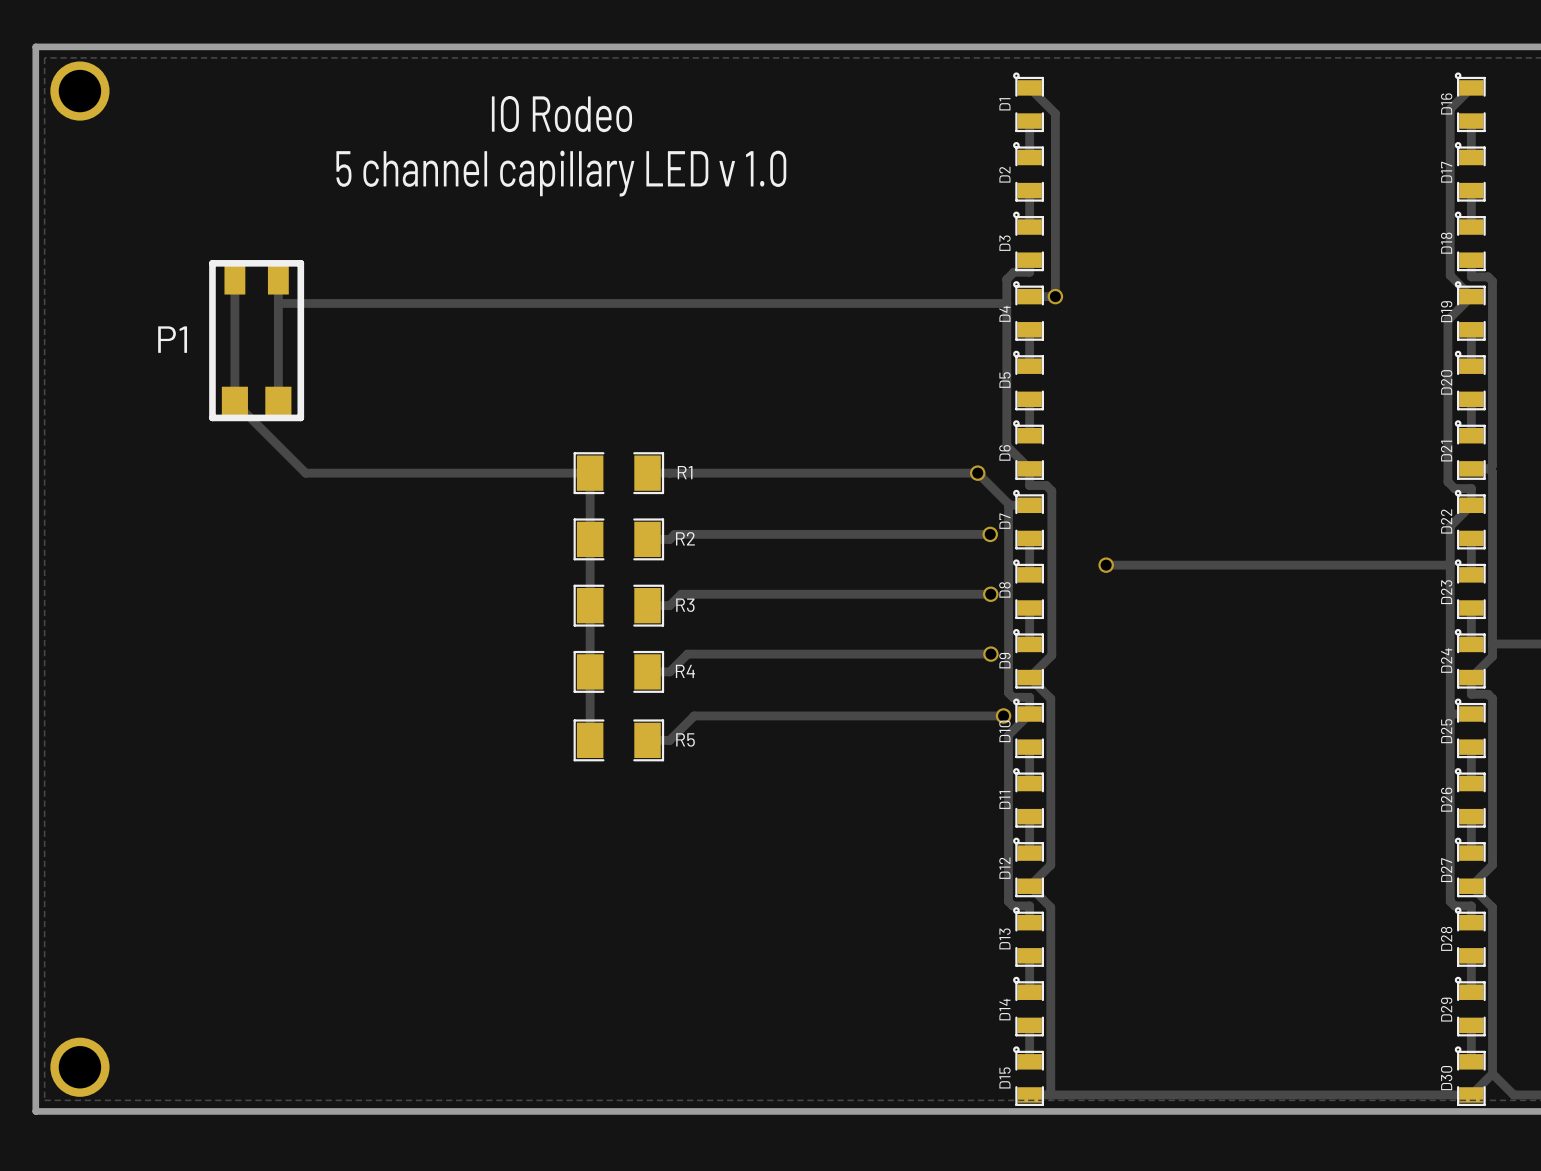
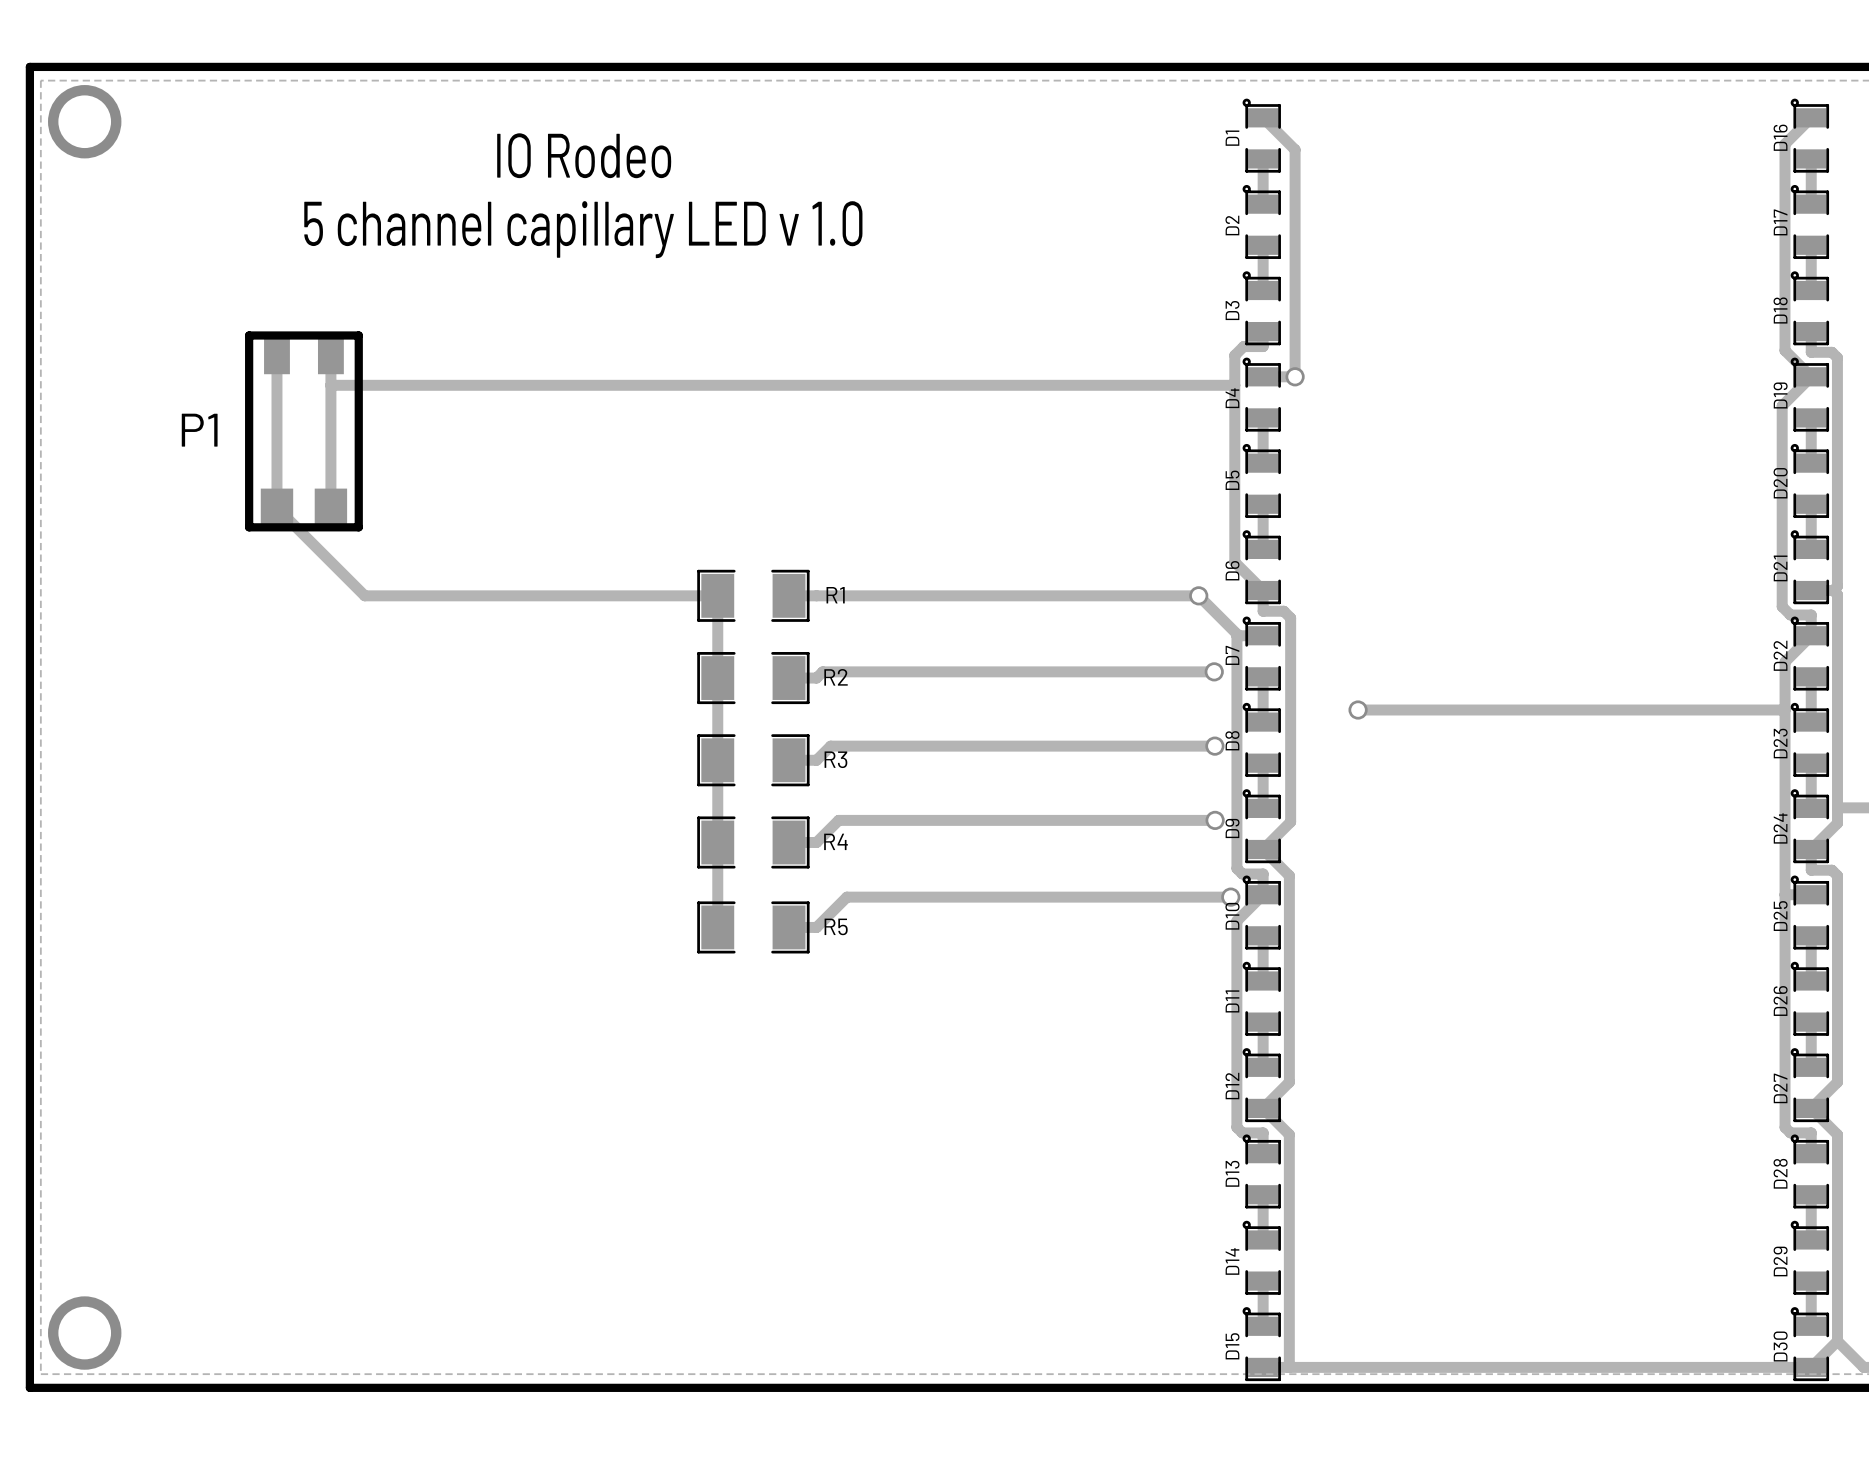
text position: IO Rodeo (561, 114) -> IO Rodeo (584, 155)
text position: 5 channel capillary LED v 1.0 (561, 173) -> 5 channel capillary LED v 1.0 (583, 229)

